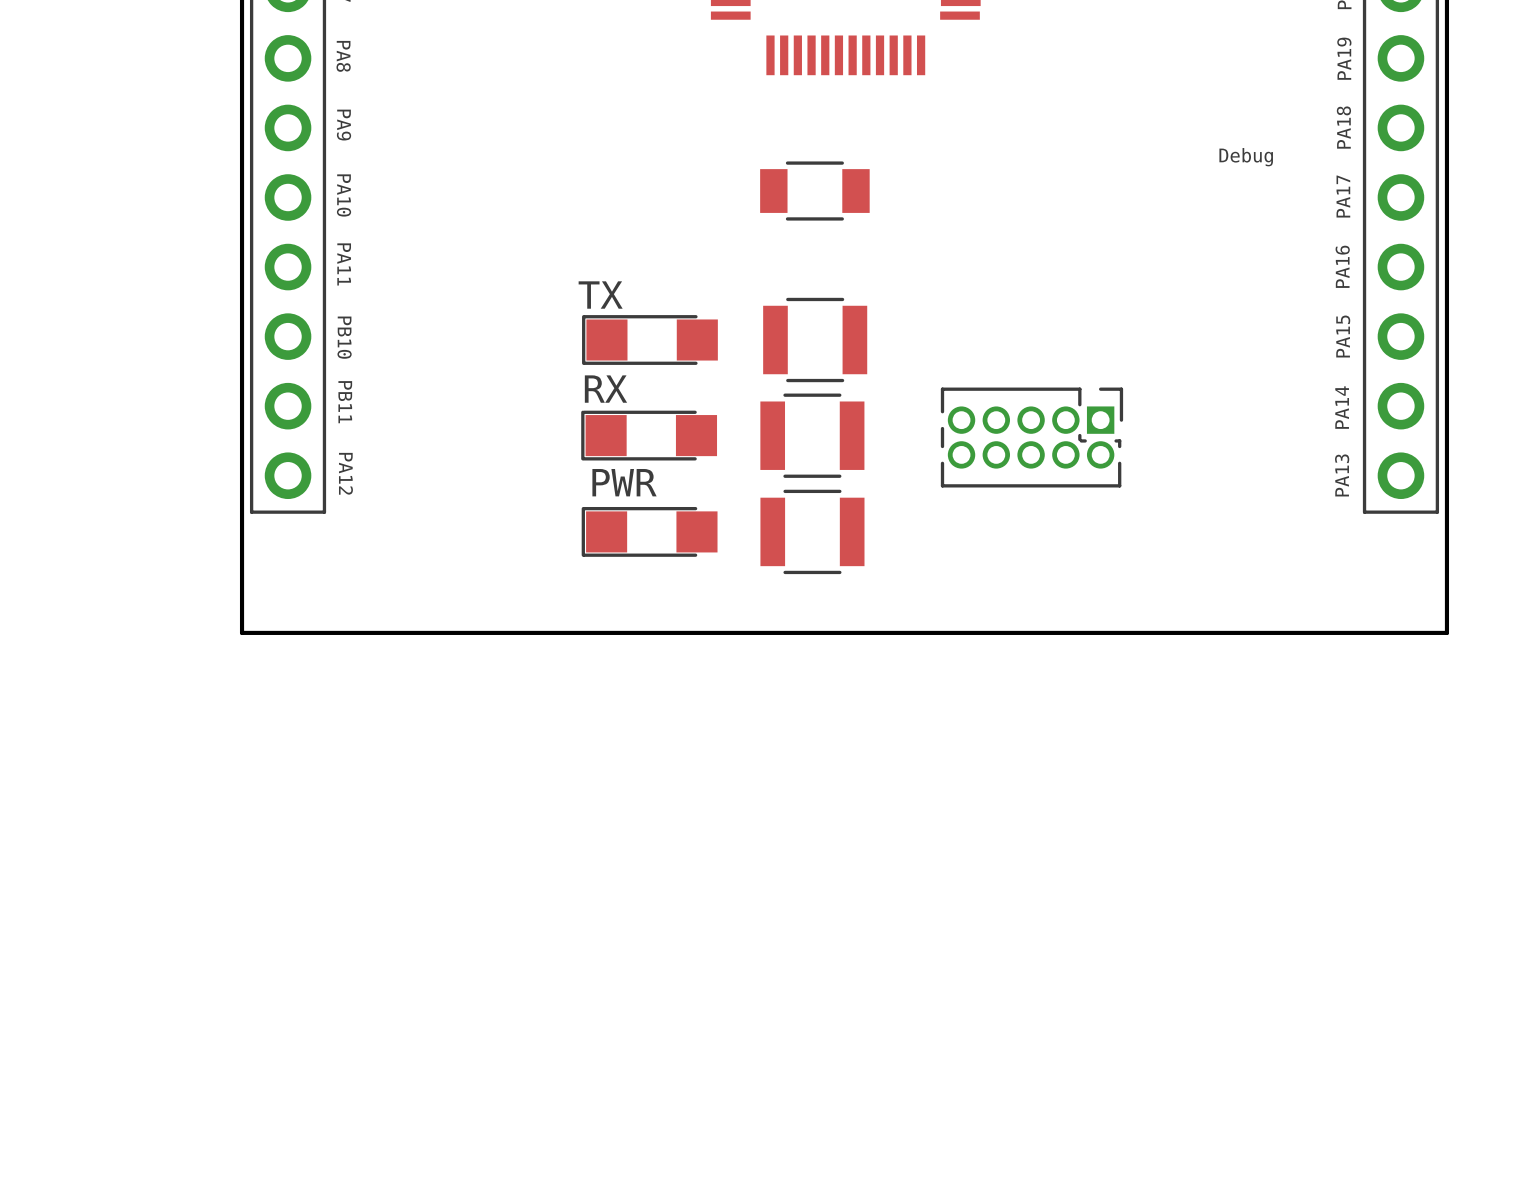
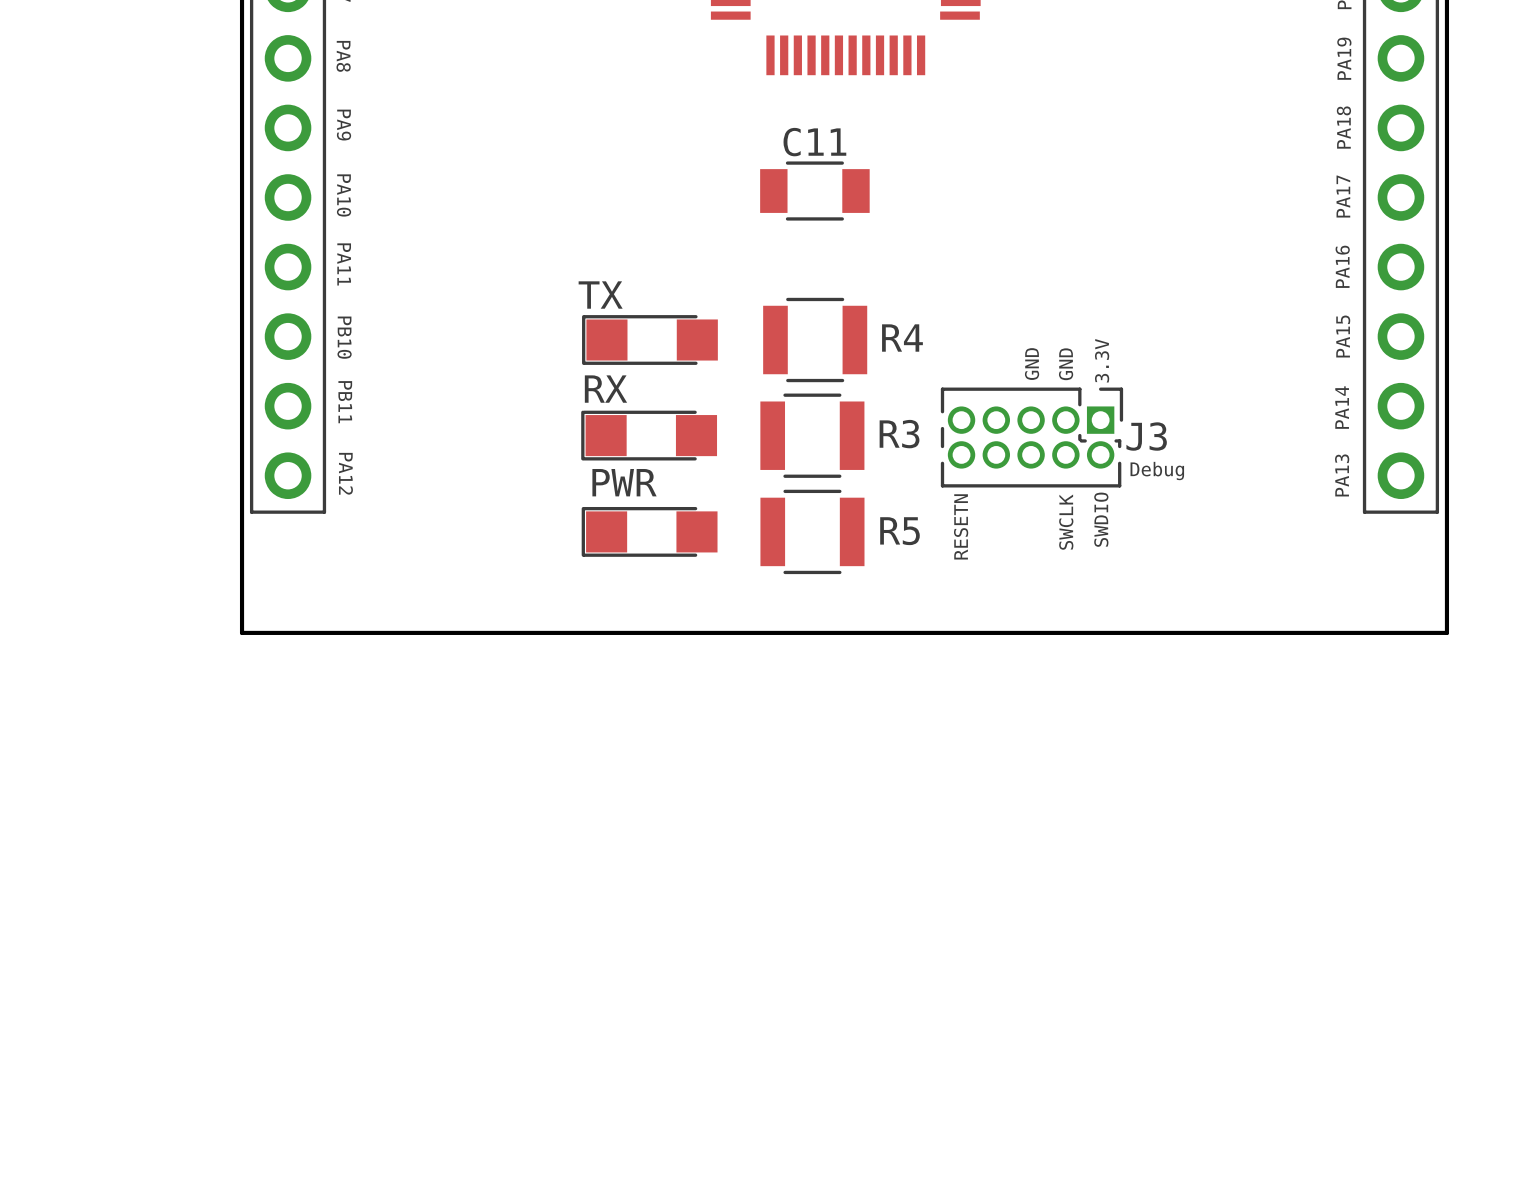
C11 name: none -> C11 (814, 142)
text position: Debug (1246, 157) -> Debug (1157, 471)
R4 name: none -> R4 (902, 338)
text: none -> 3.3V (1102, 360)
text: none -> GND (1032, 364)
text: none -> GND (1066, 364)
R3 name: none -> R3 (899, 434)
J3 name: none -> J3 (1146, 436)
text: none -> SWDIO (1101, 519)
text: none -> SWCLK (1066, 522)
text: none -> RESETN (961, 526)
R5 name: none -> R5 (899, 531)

